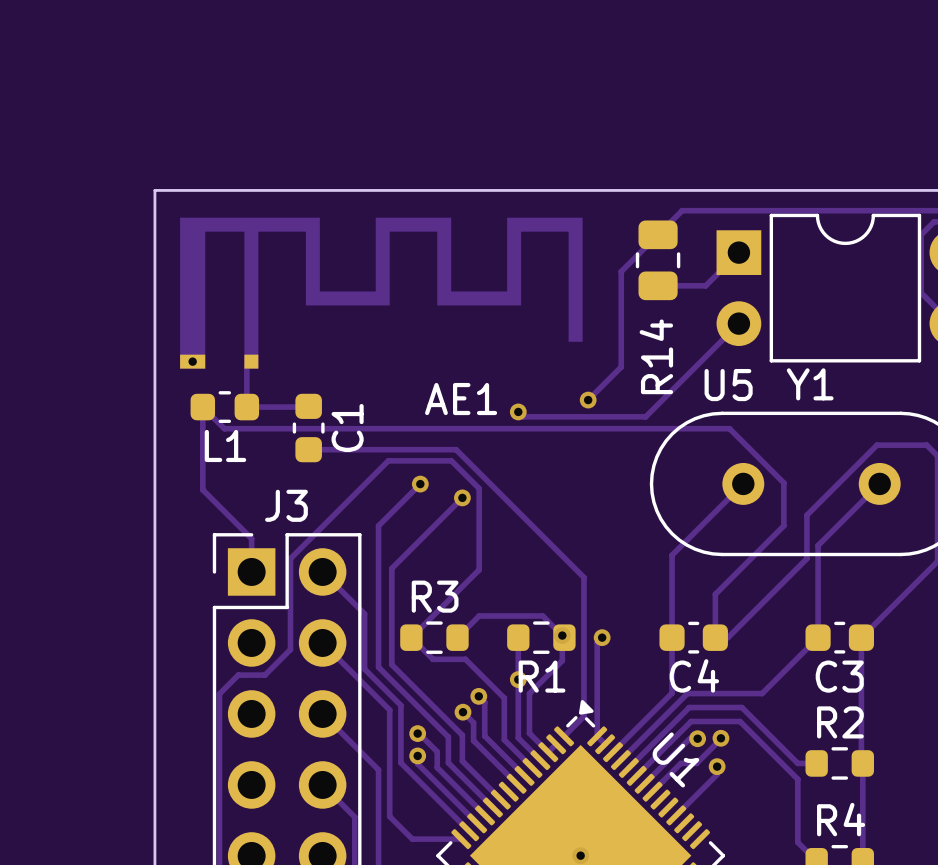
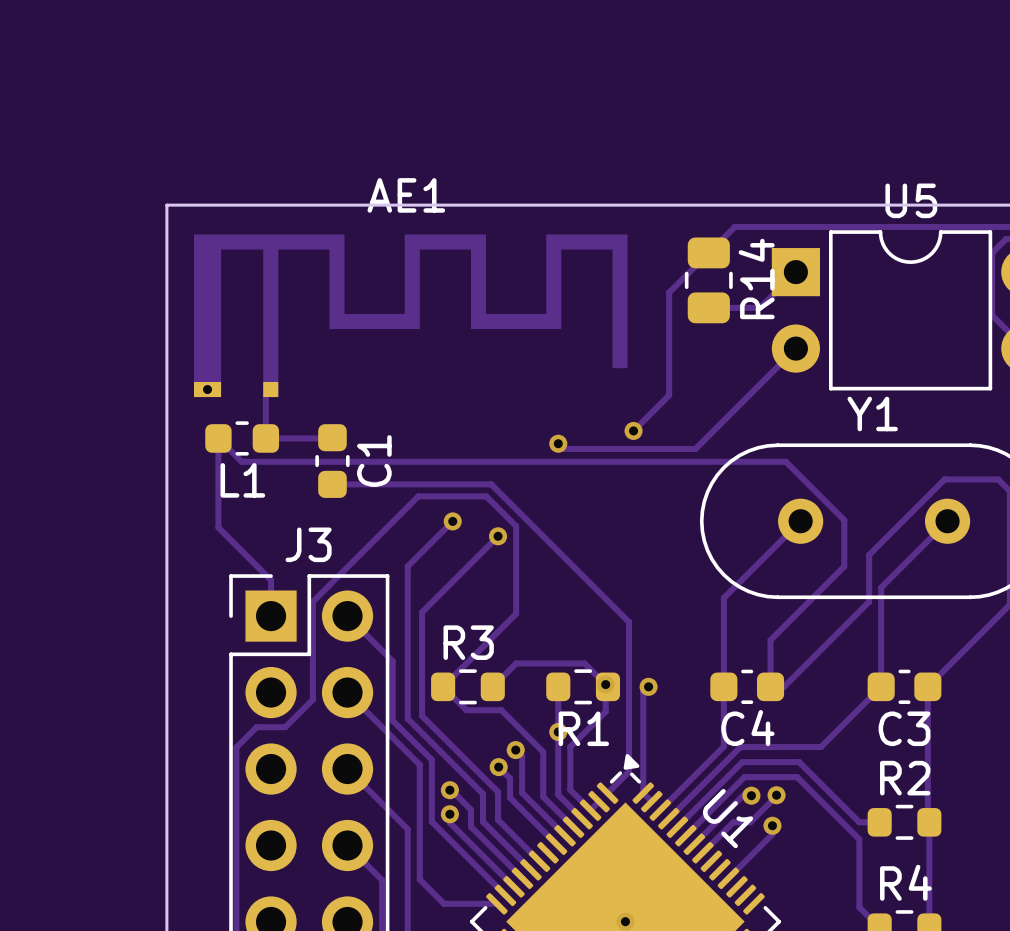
R14 name position: R14 (656, 356) -> R14 (756, 278)
U5 name position: U5 (728, 385) -> U5 (911, 200)
AE1 name position: AE1 (461, 399) -> AE1 (406, 195)

